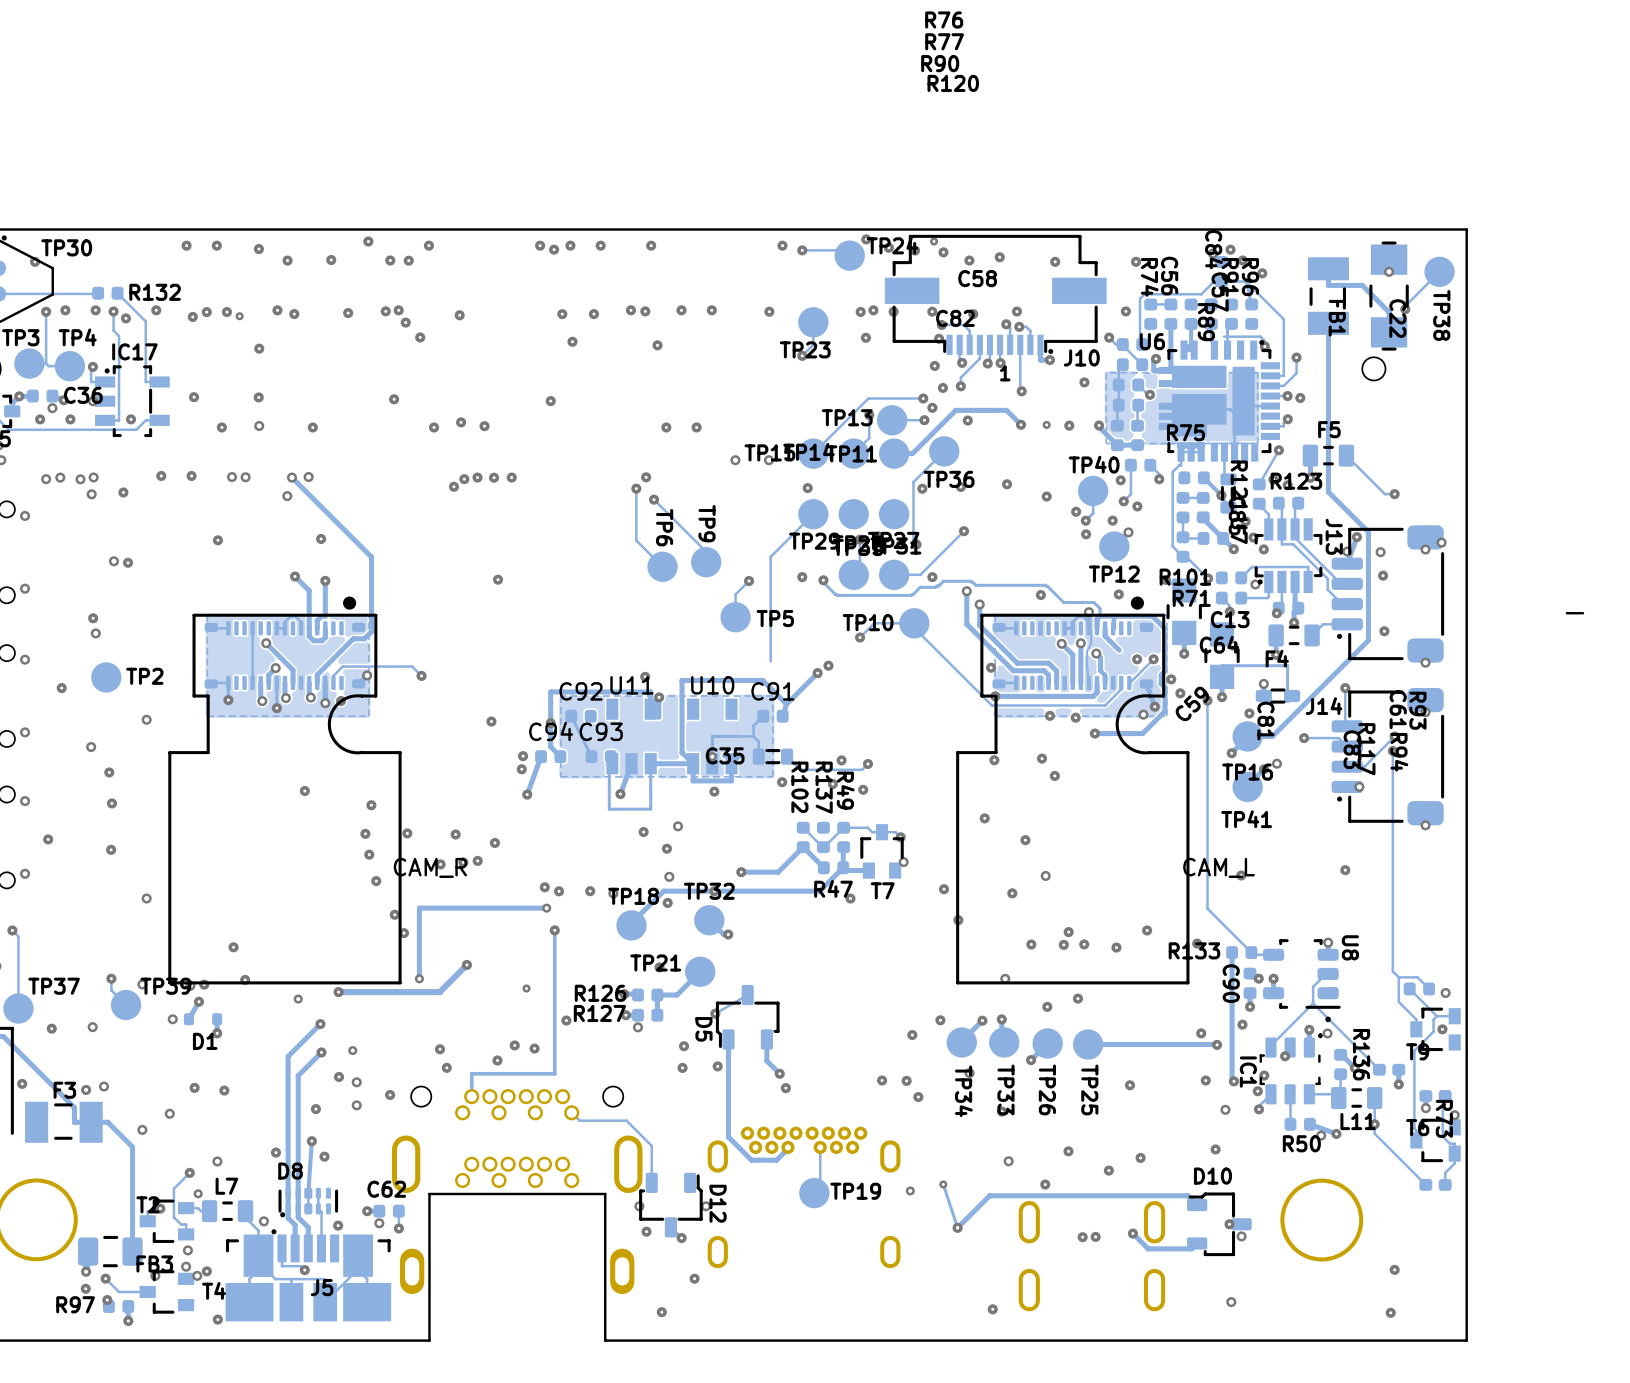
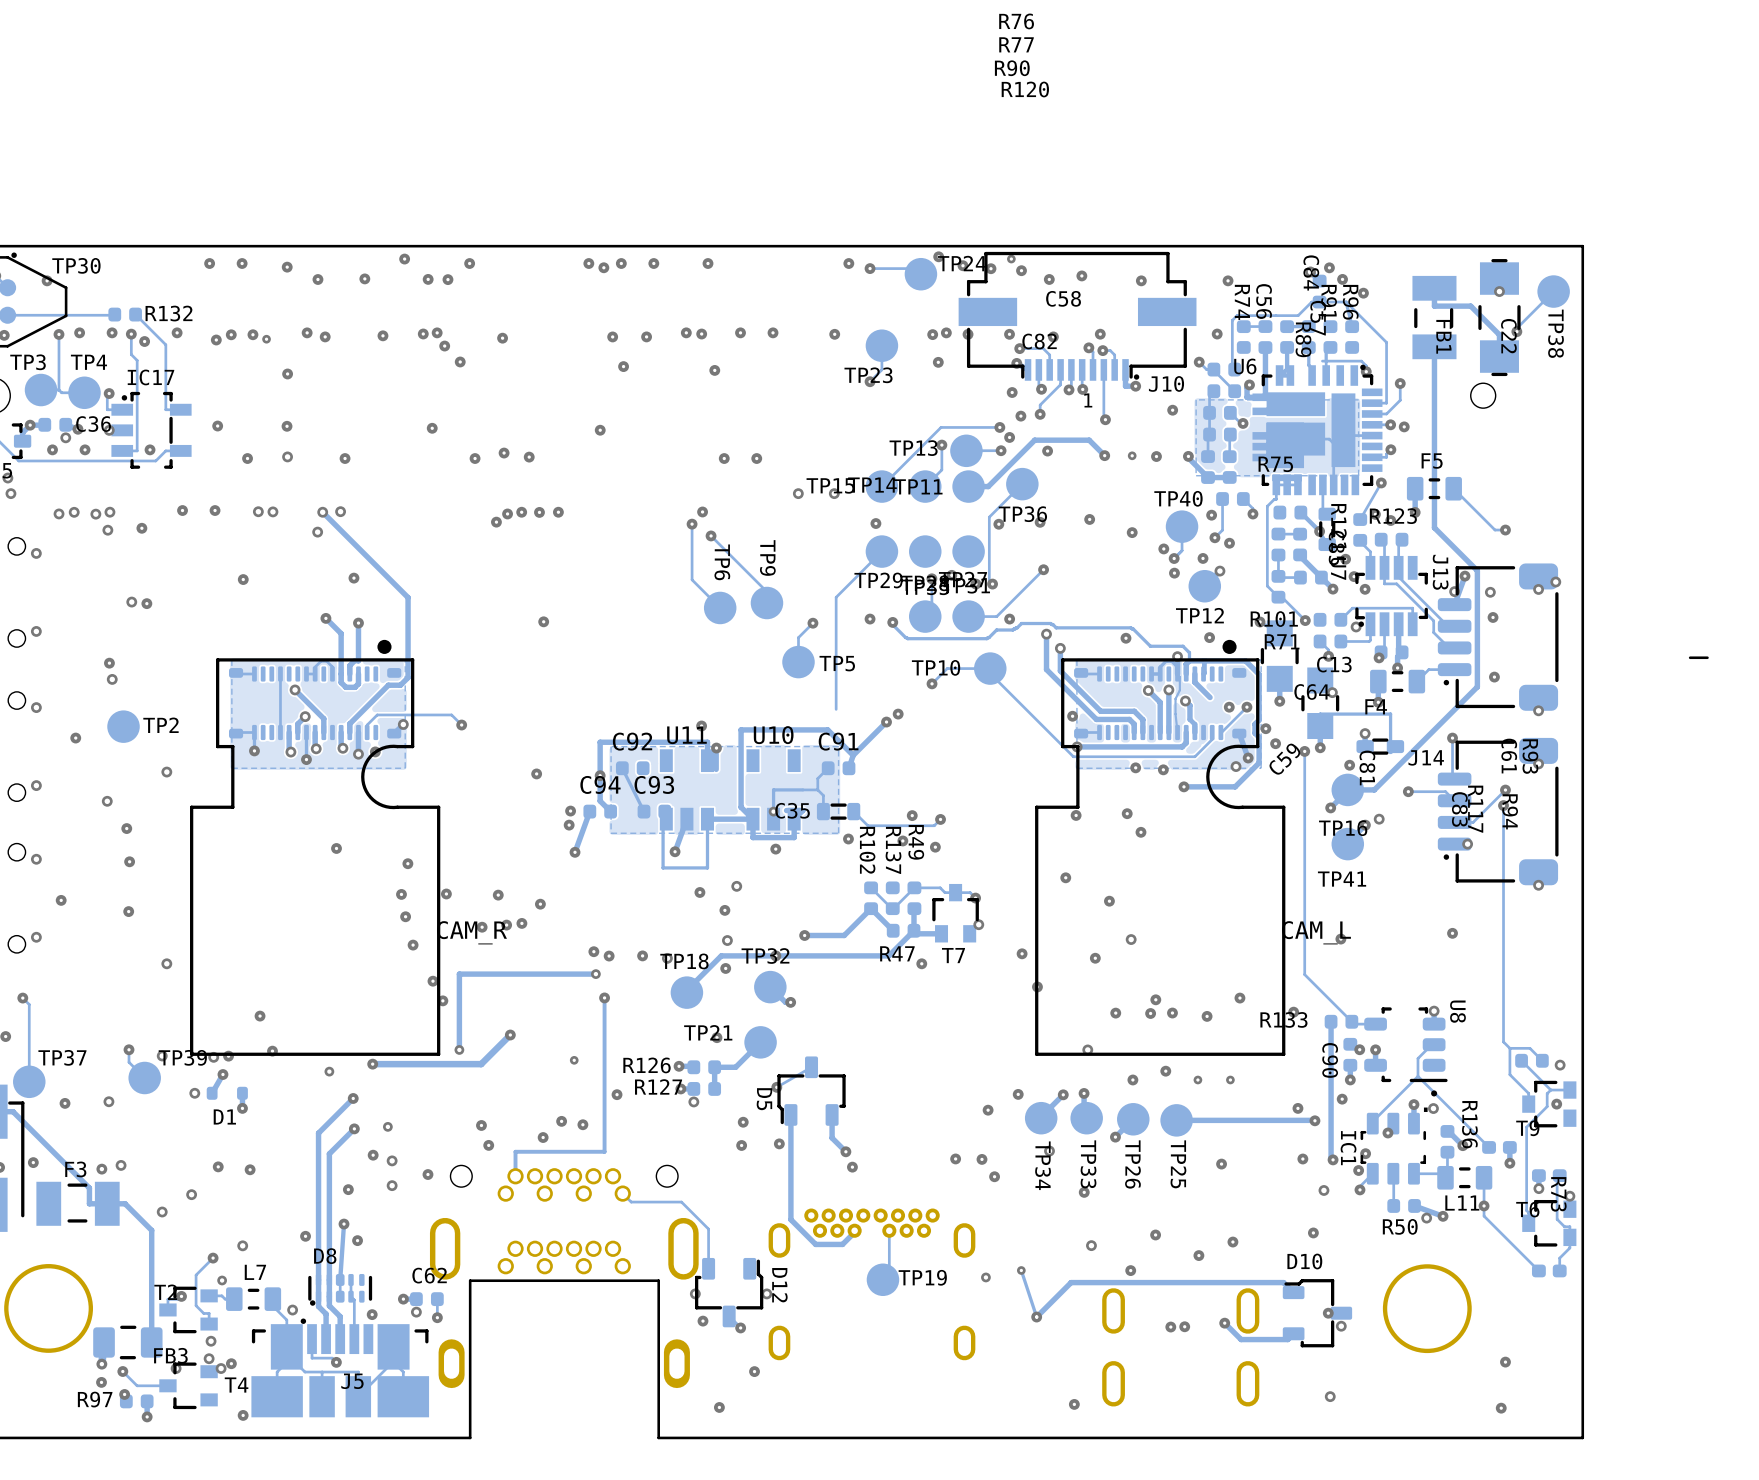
via: none -> (1197, 1080)
via: none -> (1230, 1080)

